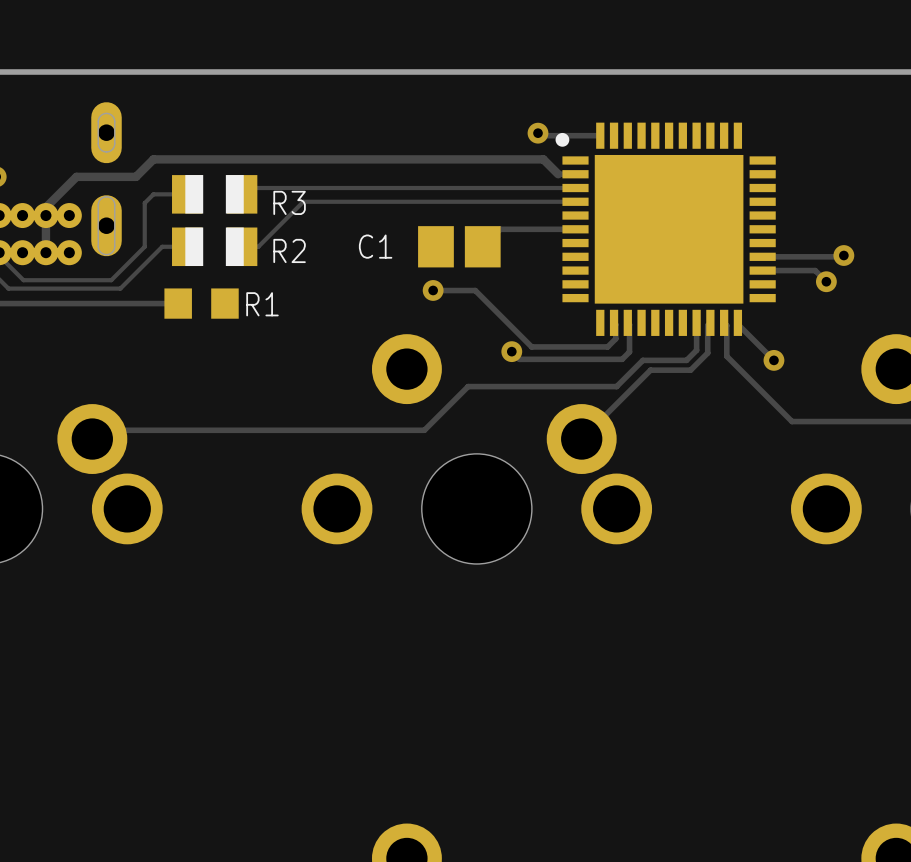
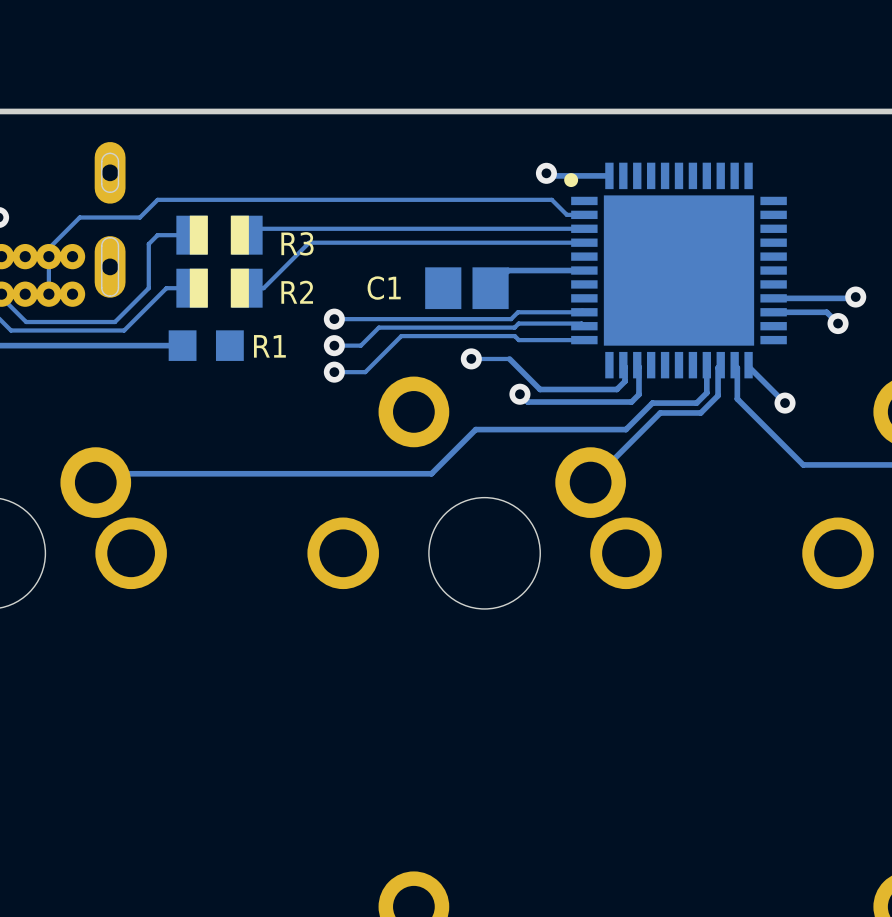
track width: thick (575, 174) (558, 174) (543, 159) (153, 159) (136, 176) (76, 176) (47, 206) (45, 252) -> thin (584, 214) (566, 214) (551, 199) (157, 199) (139, 217) (79, 217) (50, 247) (48, 294)
track: none -> (582, 310) (584, 312) (517, 312) (511, 319) (334, 319)
via: none -> (334, 319)
track: none -> (584, 326) (581, 323) (518, 323) (514, 327) (378, 327) (360, 345) (334, 345)
track: (433, 290) (475, 290) (501, 316) -> (471, 358) (509, 358)
via position: (433, 290) -> (471, 358)
track: none -> (584, 340) (518, 340) (514, 336) (401, 336) (365, 372) (334, 372)
via: none -> (334, 345)
via: none -> (334, 372)

